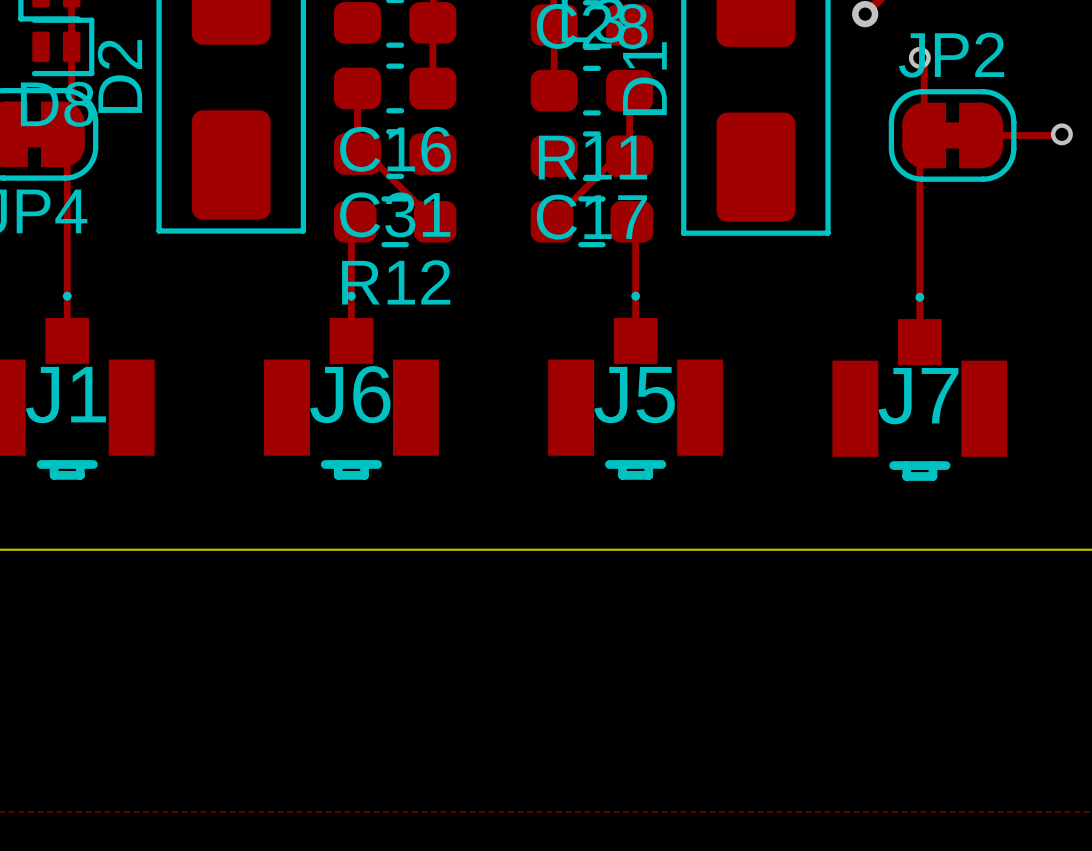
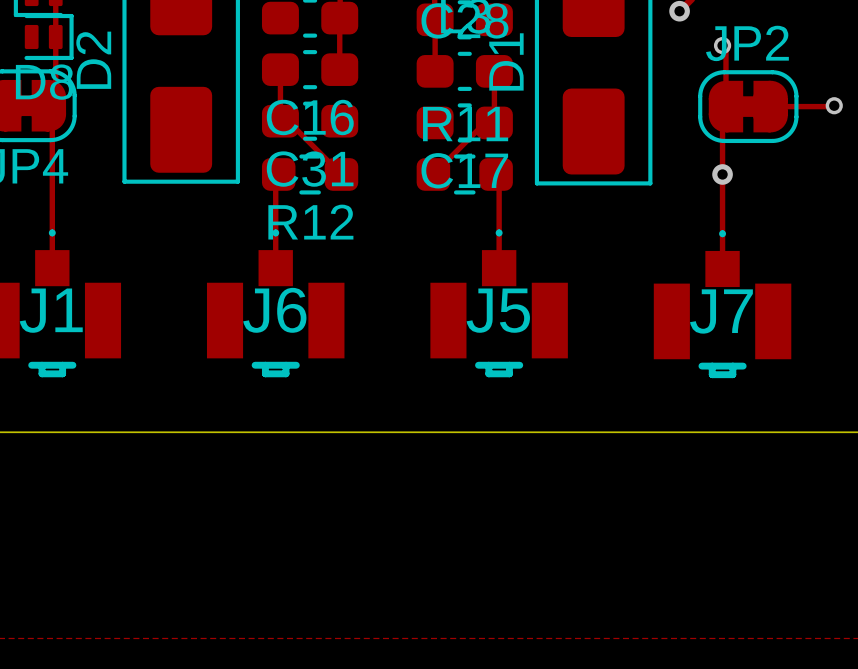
via: none -> (722, 174)

